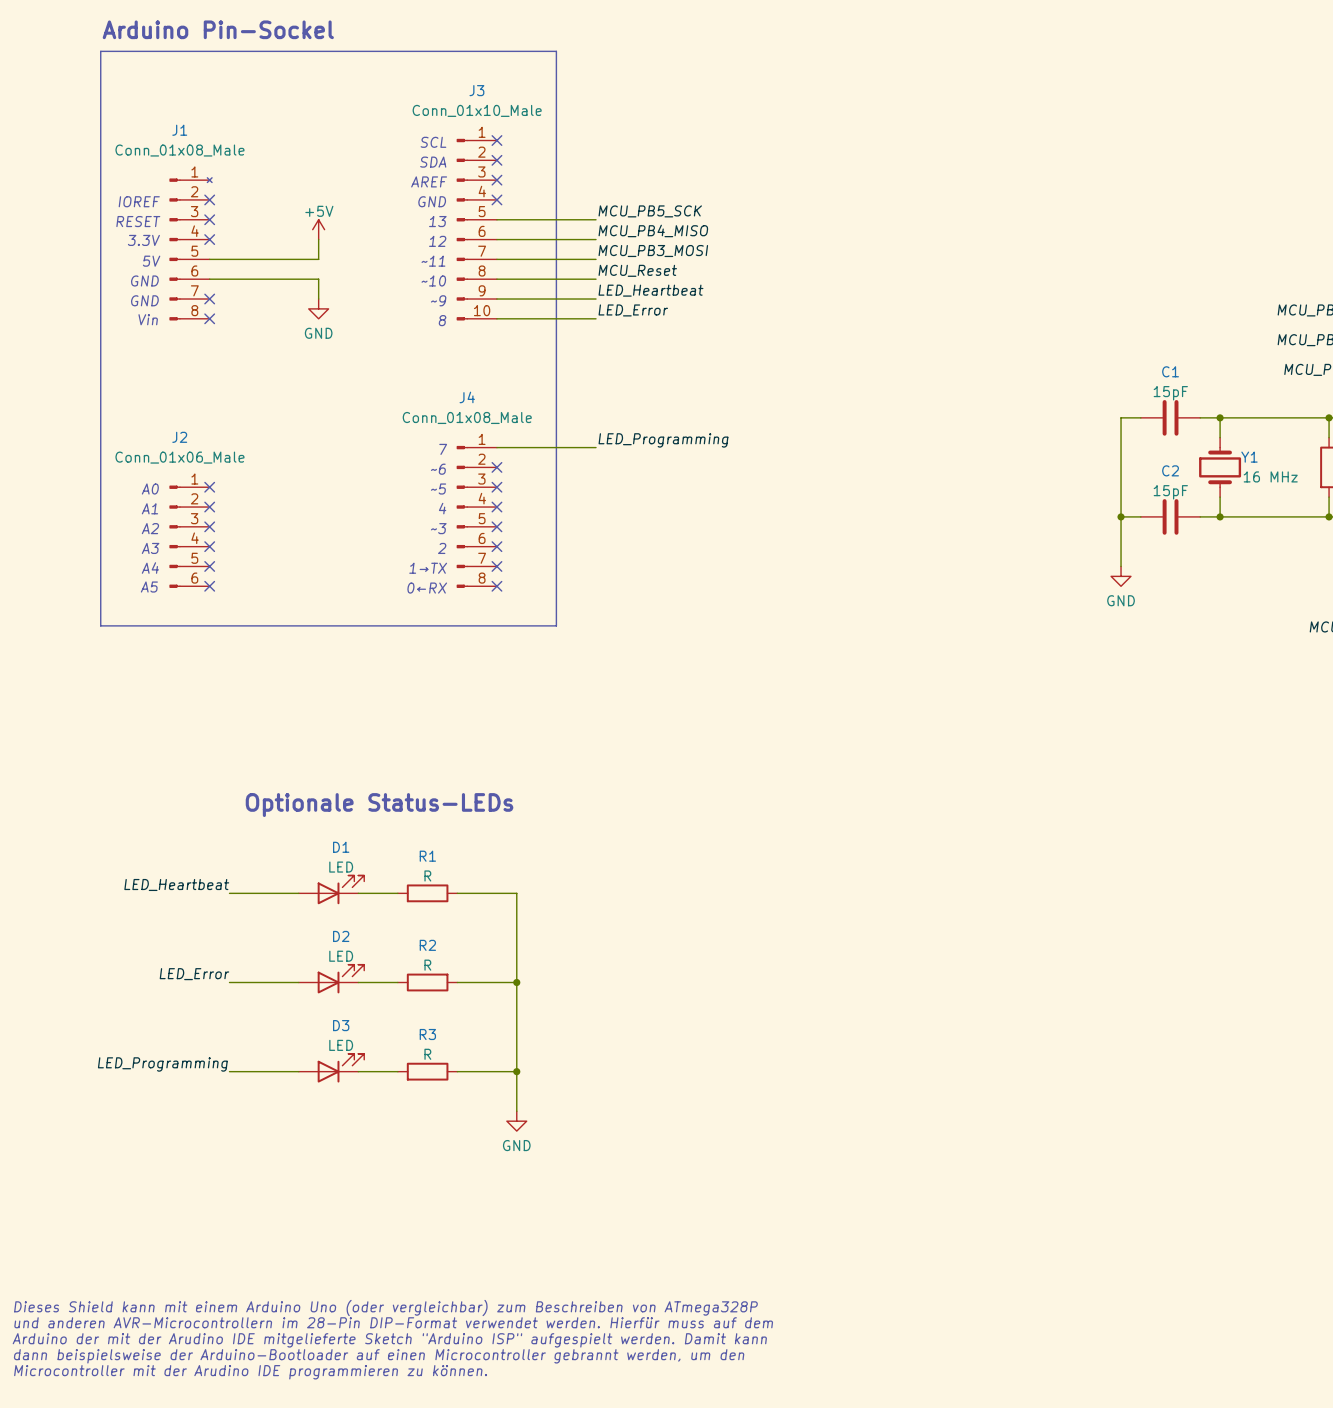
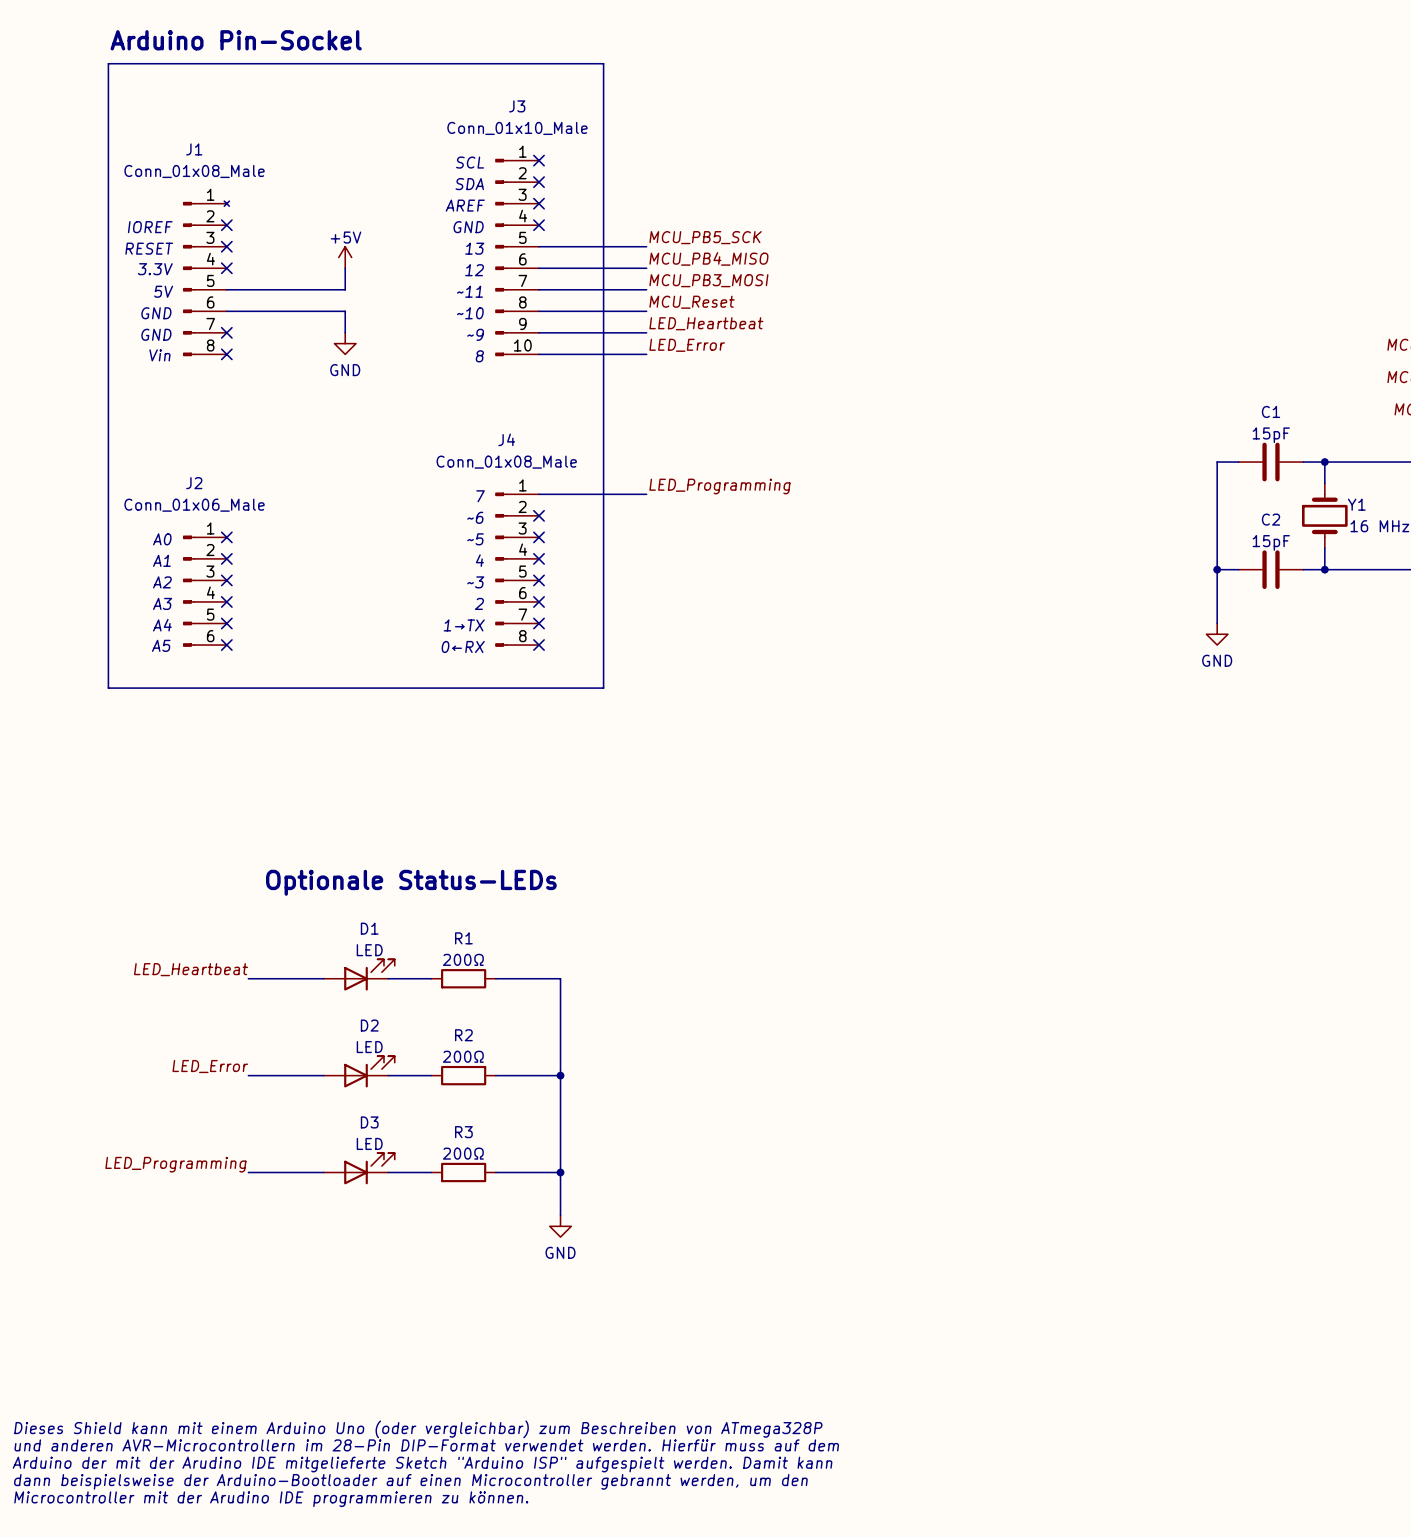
R1 value: R (427, 875) -> 200Ω (463, 959)
R2 value: R (427, 965) -> 200Ω (463, 1056)
R3 value: R (427, 1054) -> 200Ω (463, 1153)

